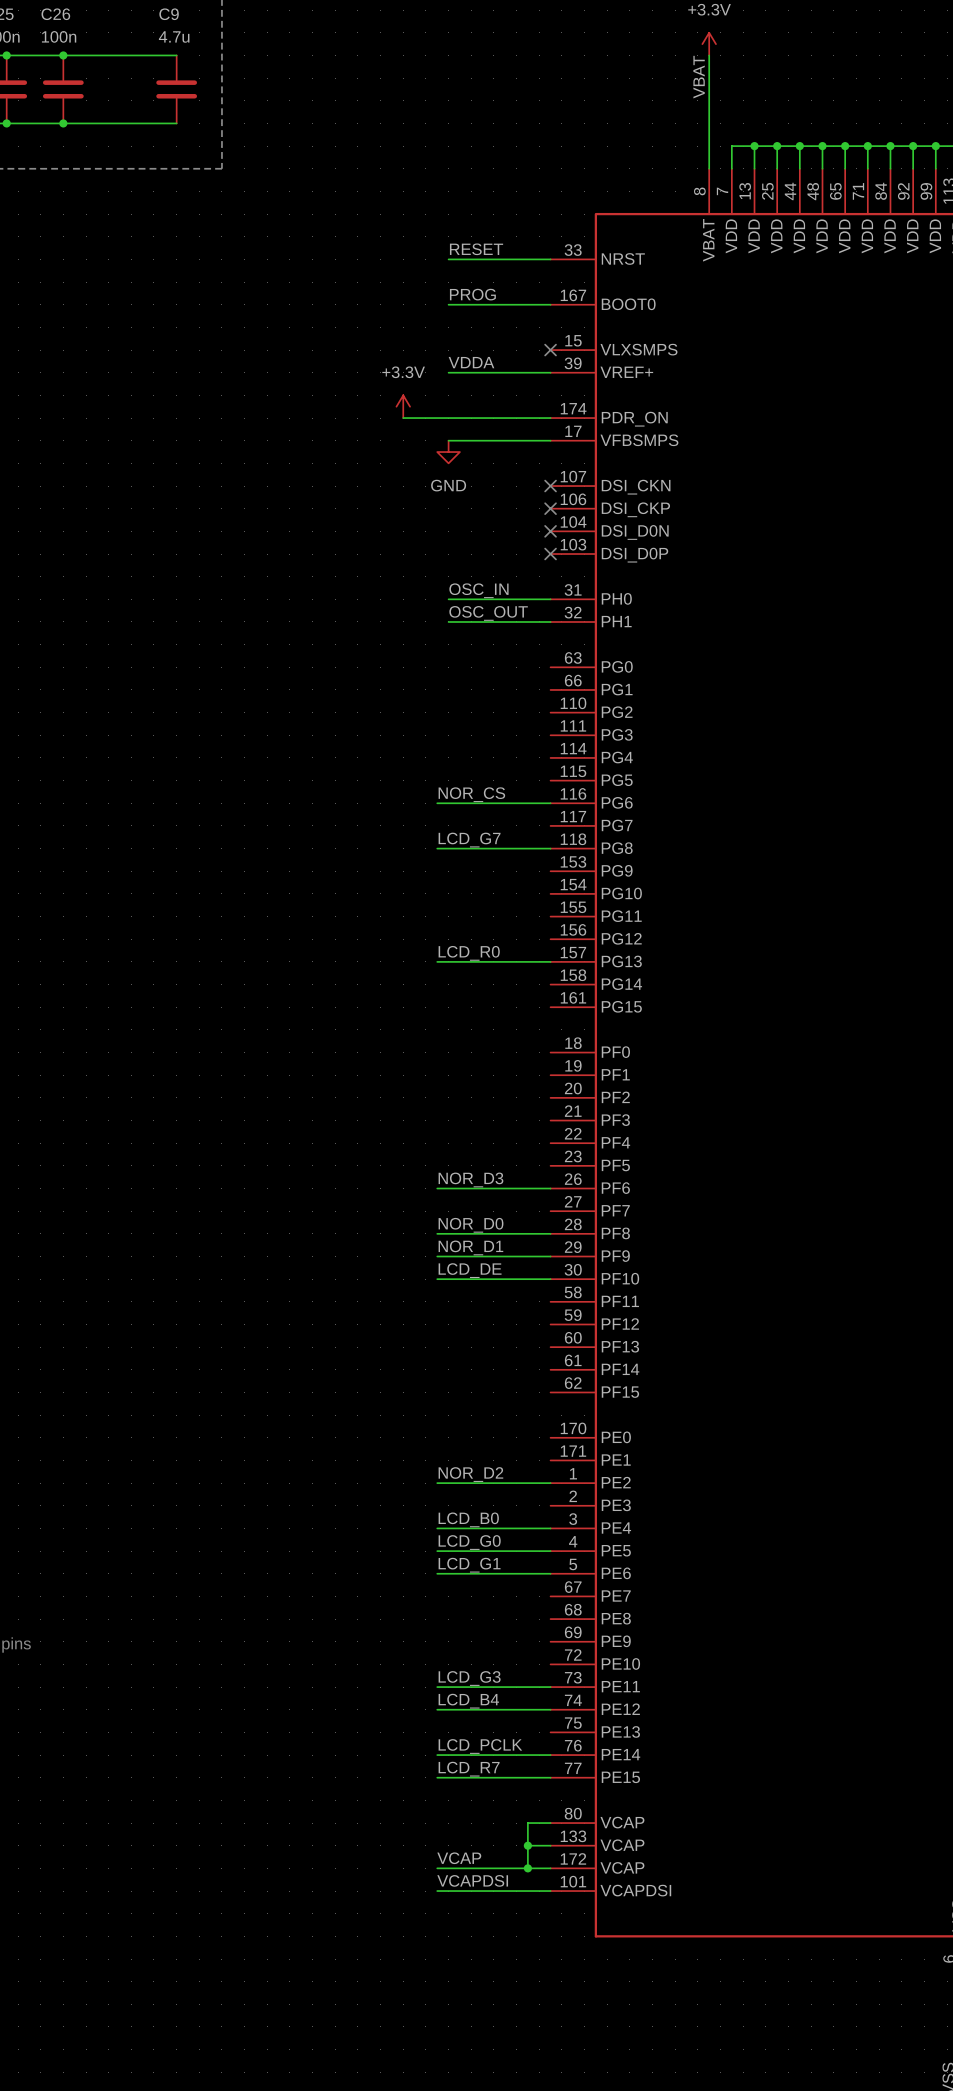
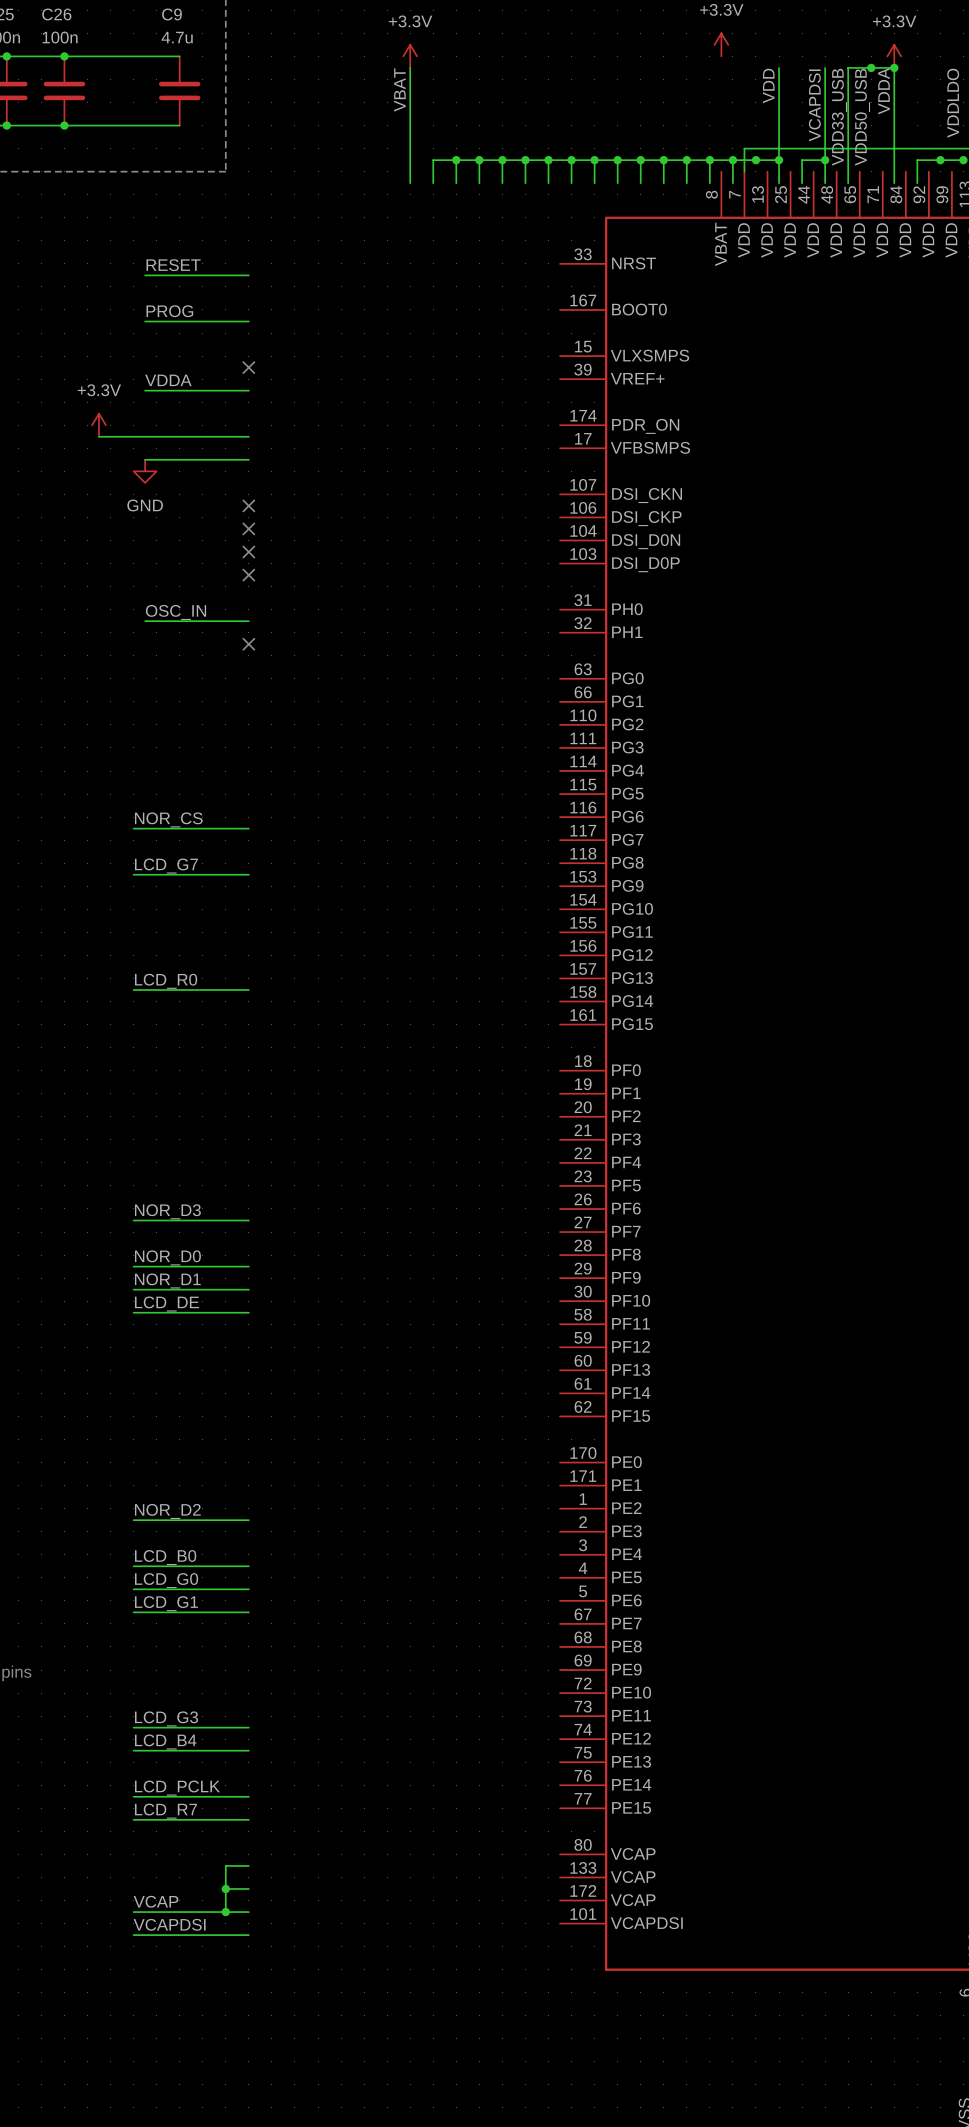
power symbol: none -> +3.3V (410, 56)
wire: (709, 55) (709, 168) -> (779, 67) (779, 183)
power symbol: none -> +3.3V (894, 56)
wire: none -> (410, 67) (410, 183)
wire: none -> (825, 67) (825, 183)
junction: none -> (871, 67)
junction: none -> (894, 67)
label: VBAT (699, 77) -> none
label: none -> VDD (768, 85)
label: none -> VBAT (399, 89)
label: none -> VDDA (884, 91)
label: none -> VDDLDO (953, 103)
label: none -> VCAPDSI (814, 105)
label: none -> VDD33_USB (839, 117)
label: none -> VDD50_USB (862, 117)
wire: (754, 146) (754, 168) -> (548, 160) (548, 183)
junction: (754, 146) -> none
wire: (777, 146) (777, 168) -> (571, 160) (571, 183)
junction: (777, 146) -> none
wire: (799, 146) (799, 168) -> (594, 160) (594, 183)
junction: (799, 146) -> none
wire: (822, 146) (822, 168) -> (617, 160) (617, 183)
junction: (822, 146) -> none
wire: (845, 146) (845, 168) -> (640, 160) (640, 183)
junction: (845, 146) -> none
wire: (867, 146) (867, 168) -> (663, 160) (663, 183)
junction: (867, 146) -> none
wire: (890, 146) (890, 168) -> (686, 160) (686, 183)
junction: (890, 146) -> none
wire: (913, 146) (913, 168) -> (709, 160) (709, 183)
junction: (913, 146) -> none
wire: (935, 146) (935, 168) -> (732, 160) (732, 183)
junction: (935, 146) -> none
wire: none -> (456, 160) (456, 183)
junction: none -> (456, 160)
wire: none -> (479, 160) (479, 183)
junction: none -> (479, 160)
wire: none -> (502, 160) (502, 183)
junction: none -> (502, 160)
wire: none -> (525, 160) (525, 183)
junction: none -> (525, 160)
junction: none -> (548, 160)
junction: none -> (571, 160)
junction: none -> (594, 160)
junction: none -> (617, 160)
junction: none -> (640, 160)
junction: none -> (663, 160)
junction: none -> (686, 160)
junction: none -> (709, 160)
junction: none -> (732, 160)
junction: none -> (755, 160)
wire: none -> (779, 160) (433, 160) (433, 183)
junction: none -> (779, 160)
wire: none -> (825, 160) (802, 160) (802, 183)
junction: none -> (825, 160)
junction: none -> (940, 160)
wire: none -> (963, 160) (917, 160) (917, 183)
junction: none -> (963, 160)
wire: none -> (848, 183) (848, 67) (894, 67) (894, 183)
label: RESET (476, 249) -> none
wire: (448, 259) (550, 259) -> none
label: none -> RESET (173, 265)
wire: none -> (145, 275) (248, 275)
label: PROG (472, 294) -> none
wire: (448, 304) (550, 304) -> none
label: none -> PROG (169, 311)
wire: none -> (145, 321) (248, 321)
no-connect mark: (550, 350) -> none
no-connect mark: none -> (248, 367)
label: VDDA (471, 362) -> none
wire: (448, 372) (550, 372) -> none
label: none -> VDDA (168, 380)
wire: none -> (145, 390) (248, 390)
power symbol: +3.3V (403, 406) -> none
power symbol: none -> +3.3V (99, 425)
wire: (403, 418) (550, 418) -> none
wire: none -> (99, 436) (248, 436)
wire: (448, 440) (550, 440) -> none
wire: none -> (145, 459) (248, 459)
power symbol: GND (448, 452) -> none
power symbol: none -> GND (145, 471)
no-connect mark: (550, 486) -> none
no-connect mark: none -> (248, 505)
no-connect mark: (550, 508) -> none
no-connect mark: none -> (248, 528)
no-connect mark: (550, 531) -> none
no-connect mark: none -> (248, 552)
no-connect mark: (550, 554) -> none
no-connect mark: none -> (248, 575)
label: OSC_IN (478, 590) -> none
wire: (448, 599) (550, 599) -> none
label: none -> OSC_IN (176, 612)
wire: none -> (145, 621) (248, 621)
label: OSC_OUT (488, 613) -> none
wire: (448, 621) (550, 621) -> none
no-connect mark: none -> (248, 644)
label: NOR_CS (471, 794) -> none
wire: (437, 803) (550, 803) -> none
label: none -> NOR_CS (168, 819)
wire: none -> (133, 828) (248, 828)
label: LCD_G7 (469, 840) -> none
wire: (437, 848) (550, 848) -> none
label: none -> LCD_G7 (166, 866)
wire: none -> (133, 874) (248, 874)
label: LCD_R0 (469, 953) -> none
wire: (437, 961) (550, 961) -> none
label: none -> LCD_R0 (166, 981)
wire: none -> (133, 990) (248, 990)
label: NOR_D3 (470, 1179) -> none
wire: (437, 1188) (550, 1188) -> none
label: none -> NOR_D3 (167, 1211)
wire: none -> (133, 1220) (248, 1220)
label: NOR_D0 (471, 1225) -> none
wire: (437, 1233) (550, 1233) -> none
label: none -> NOR_D0 (167, 1257)
wire: none -> (133, 1266) (248, 1266)
label: NOR_D1 (470, 1247) -> none
wire: (437, 1256) (550, 1256) -> none
label: none -> NOR_D1 (167, 1280)
wire: none -> (133, 1289) (248, 1289)
label: LCD_DE (470, 1270) -> none
wire: (437, 1279) (550, 1279) -> none
label: none -> LCD_DE (166, 1304)
wire: none -> (133, 1312) (248, 1312)
label: NOR_D2 (470, 1474) -> none
wire: (437, 1483) (550, 1483) -> none
label: none -> NOR_D2 (167, 1511)
wire: none -> (133, 1520) (248, 1520)
label: LCD_B0 (468, 1519) -> none
wire: (437, 1528) (550, 1528) -> none
label: none -> LCD_B0 (165, 1557)
wire: none -> (133, 1566) (248, 1566)
label: LCD_G0 (469, 1542) -> none
wire: (437, 1551) (550, 1551) -> none
label: none -> LCD_G0 (166, 1580)
wire: none -> (133, 1589) (248, 1589)
label: LCD_G1 (469, 1565) -> none
wire: (437, 1573) (550, 1573) -> none
label: none -> LCD_G1 (166, 1603)
wire: none -> (133, 1612) (248, 1612)
label: LCD_G3 (469, 1678) -> none
wire: (437, 1687) (550, 1687) -> none
label: none -> LCD_G3 (166, 1718)
wire: none -> (133, 1727) (248, 1727)
label: LCD_B4 (468, 1701) -> none
wire: (437, 1709) (550, 1709) -> none
label: none -> LCD_B4 (165, 1741)
wire: none -> (133, 1750) (248, 1750)
label: LCD_PCLK (480, 1746) -> none
wire: (437, 1755) (550, 1755) -> none
label: none -> LCD_PCLK (177, 1788)
wire: none -> (133, 1796) (248, 1796)
label: LCD_R7 (469, 1769) -> none
wire: (437, 1777) (550, 1777) -> none
label: none -> LCD_R7 (165, 1811)
wire: none -> (133, 1819) (248, 1819)
wire: (550, 1823) (527, 1823) (527, 1868) -> none
wire: none -> (248, 1865) (225, 1865) (225, 1912)
wire: (527, 1845) (550, 1845) -> none
junction: (527, 1845) -> none
wire: none -> (225, 1889) (248, 1889)
junction: none -> (225, 1889)
label: VCAP (459, 1858) -> none
wire: (437, 1868) (550, 1868) -> none
junction: (527, 1868) -> none
label: none -> VCAP (155, 1901)
wire: none -> (133, 1912) (248, 1912)
junction: none -> (225, 1912)
label: VCAPDSI (472, 1880) -> none
wire: (437, 1891) (550, 1891) -> none
label: none -> VCAPDSI (169, 1924)
wire: none -> (133, 1935) (248, 1935)

